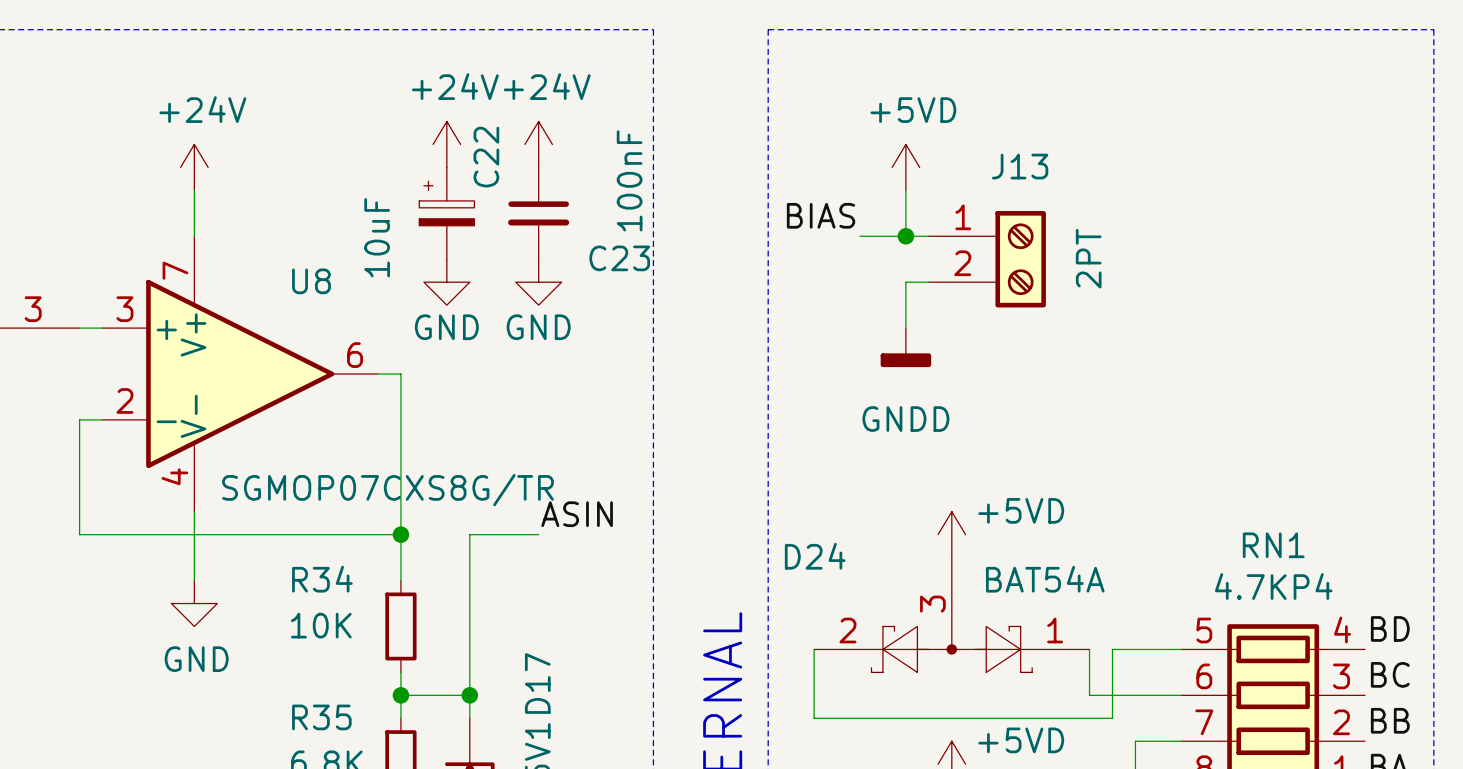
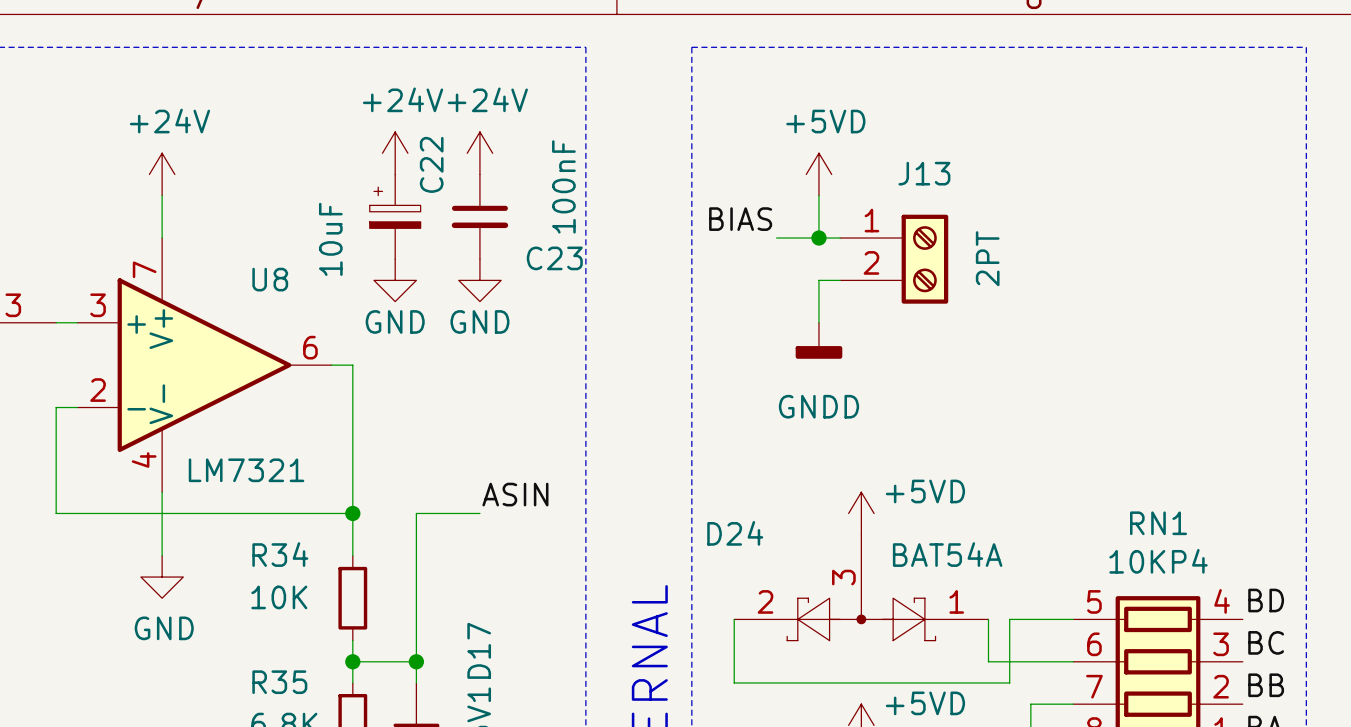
U8 value: SGMOP07CXS8G/TR (387, 490) -> LM7321 (246, 470)
RN1 value: 4.7KP4 (1273, 586) -> 10KP4 (1158, 561)

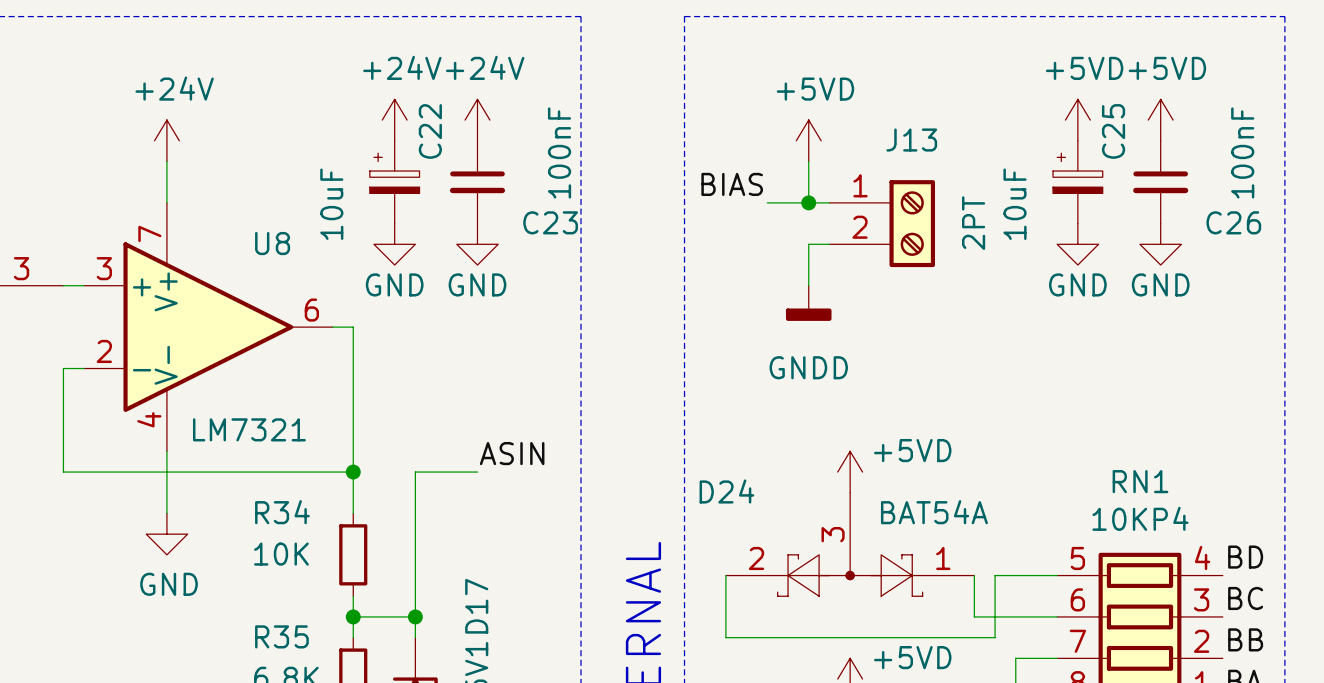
power symbol: none -> +5VD (1077, 120)
power symbol: none -> +5VD (1160, 120)
C25: none -> 10uF (1077, 182)
C26: none -> 100nF (1160, 182)
power symbol: none -> GND (1077, 244)
power symbol: none -> GND (1160, 244)

